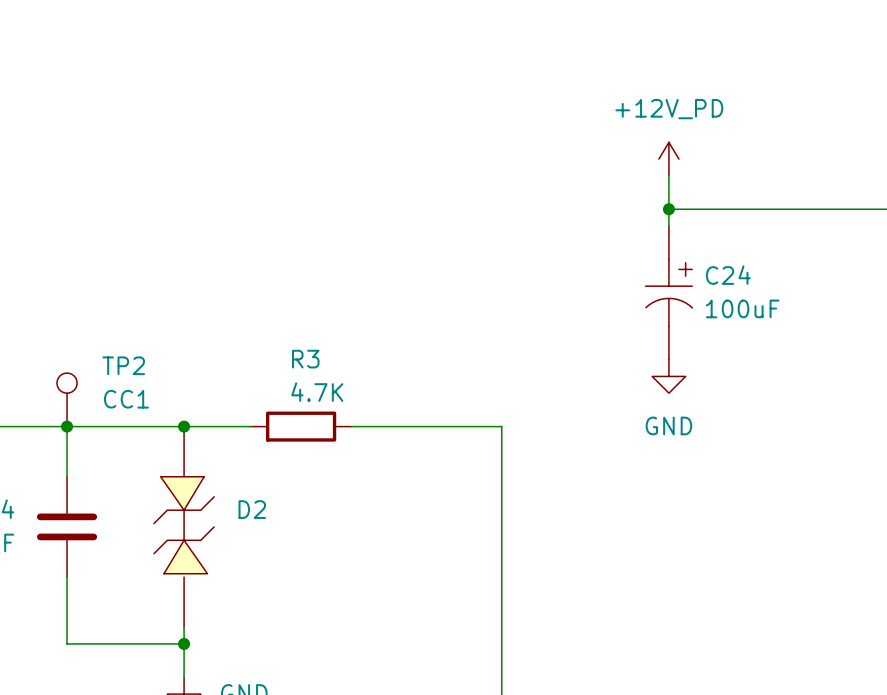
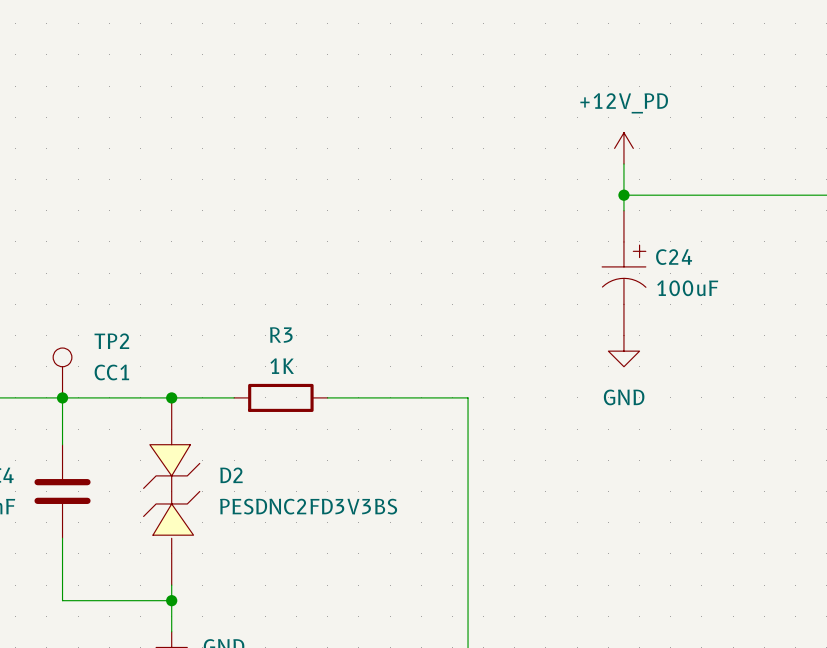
R3 value: 4.7K (317, 392) -> 1K (282, 366)
D2 value: none -> PESDNC2FD3V3BS (308, 506)

